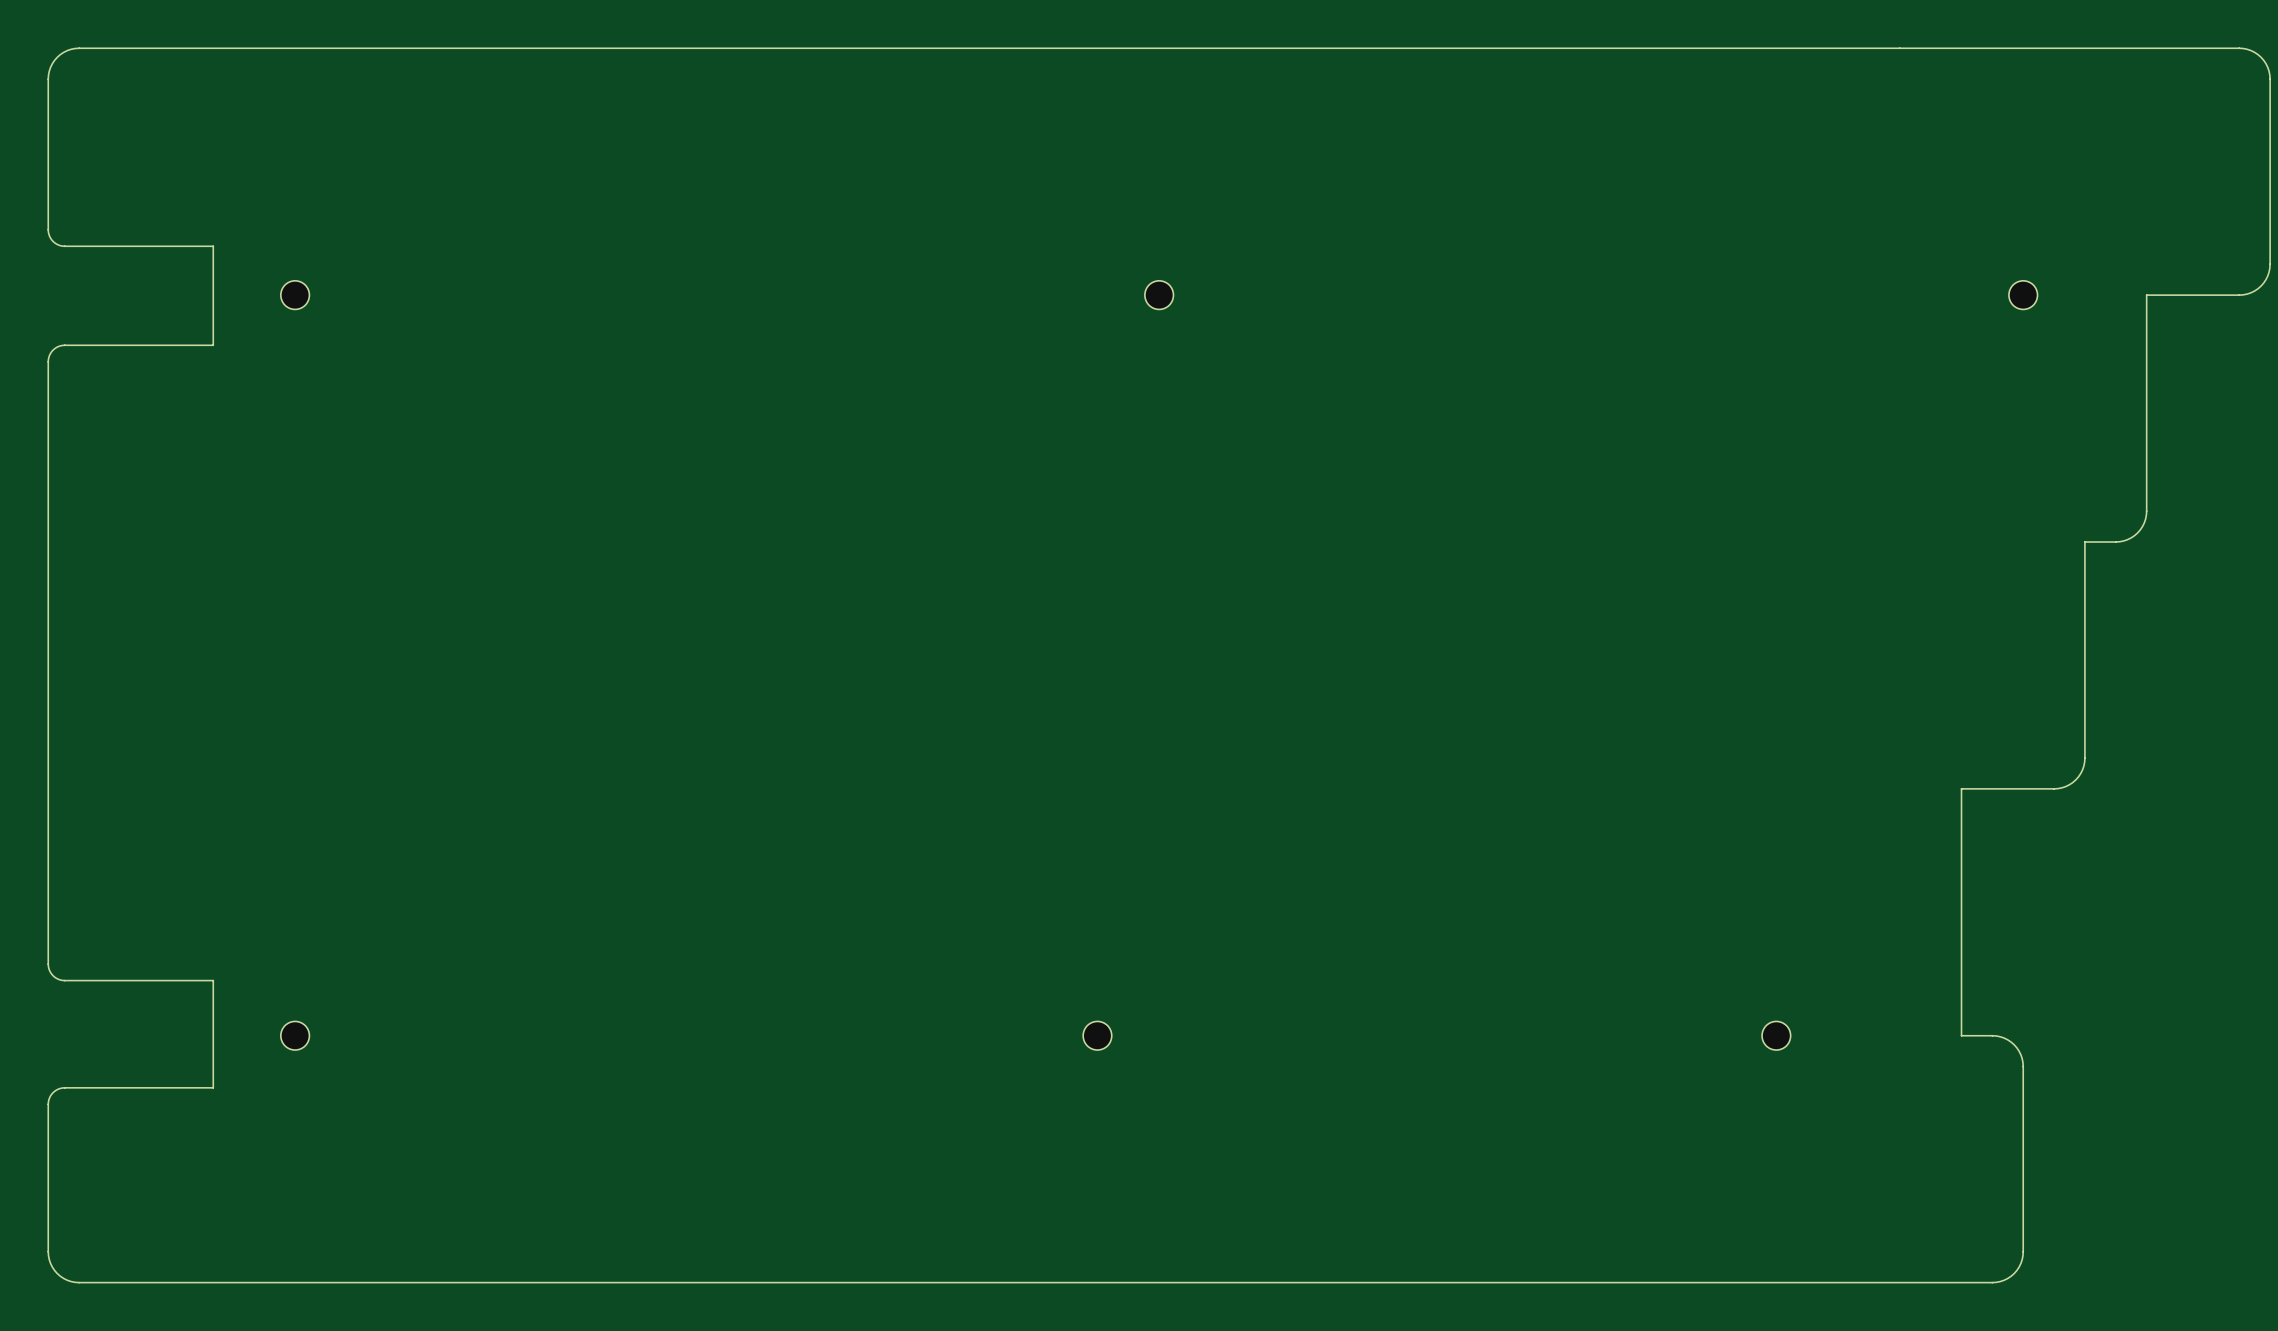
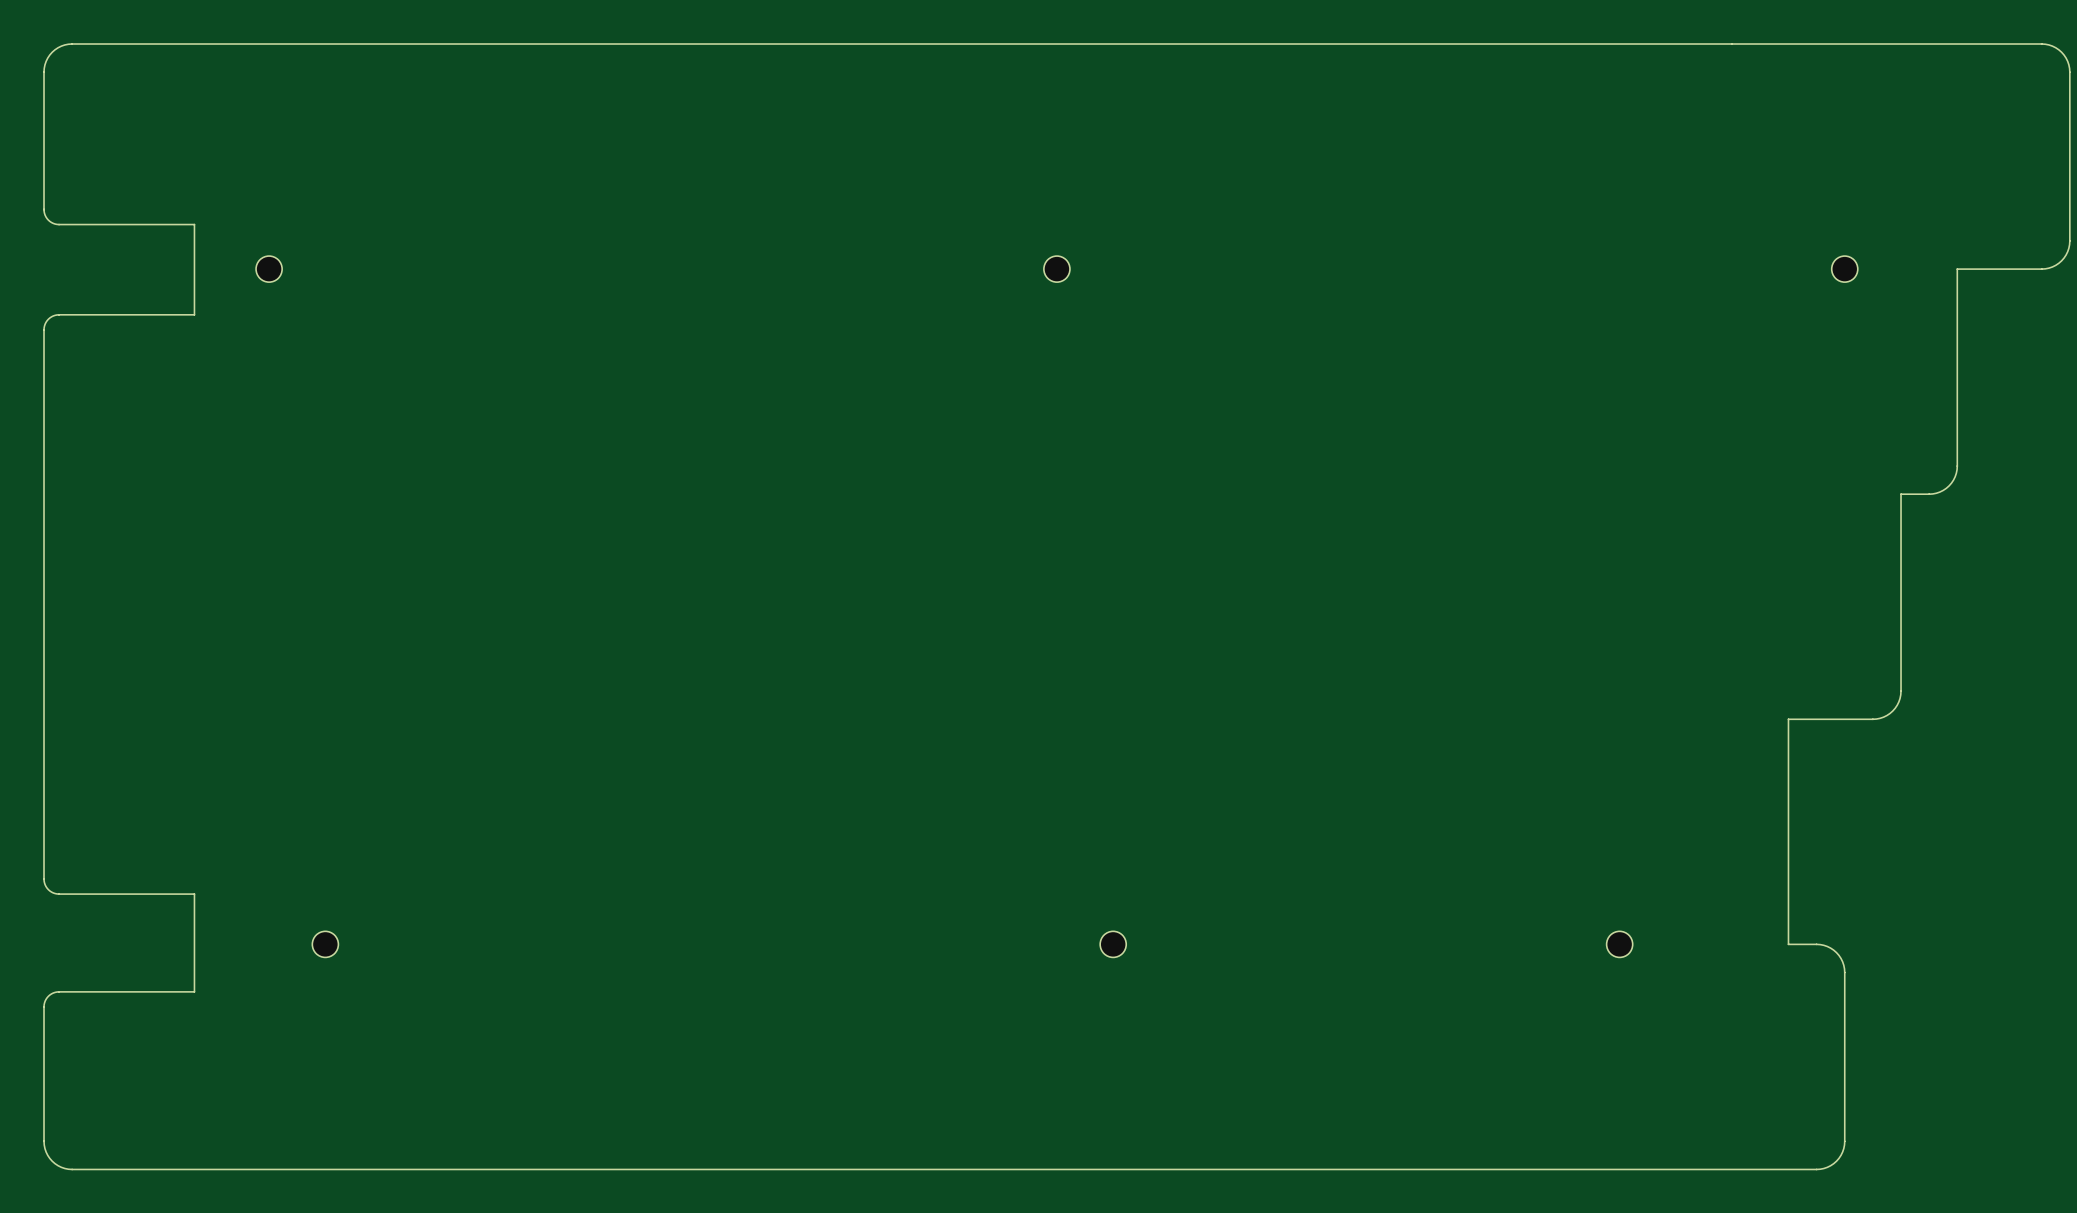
part position: (295, 1035) -> (325, 944)
part position: (1097, 1035) -> (1113, 944)

